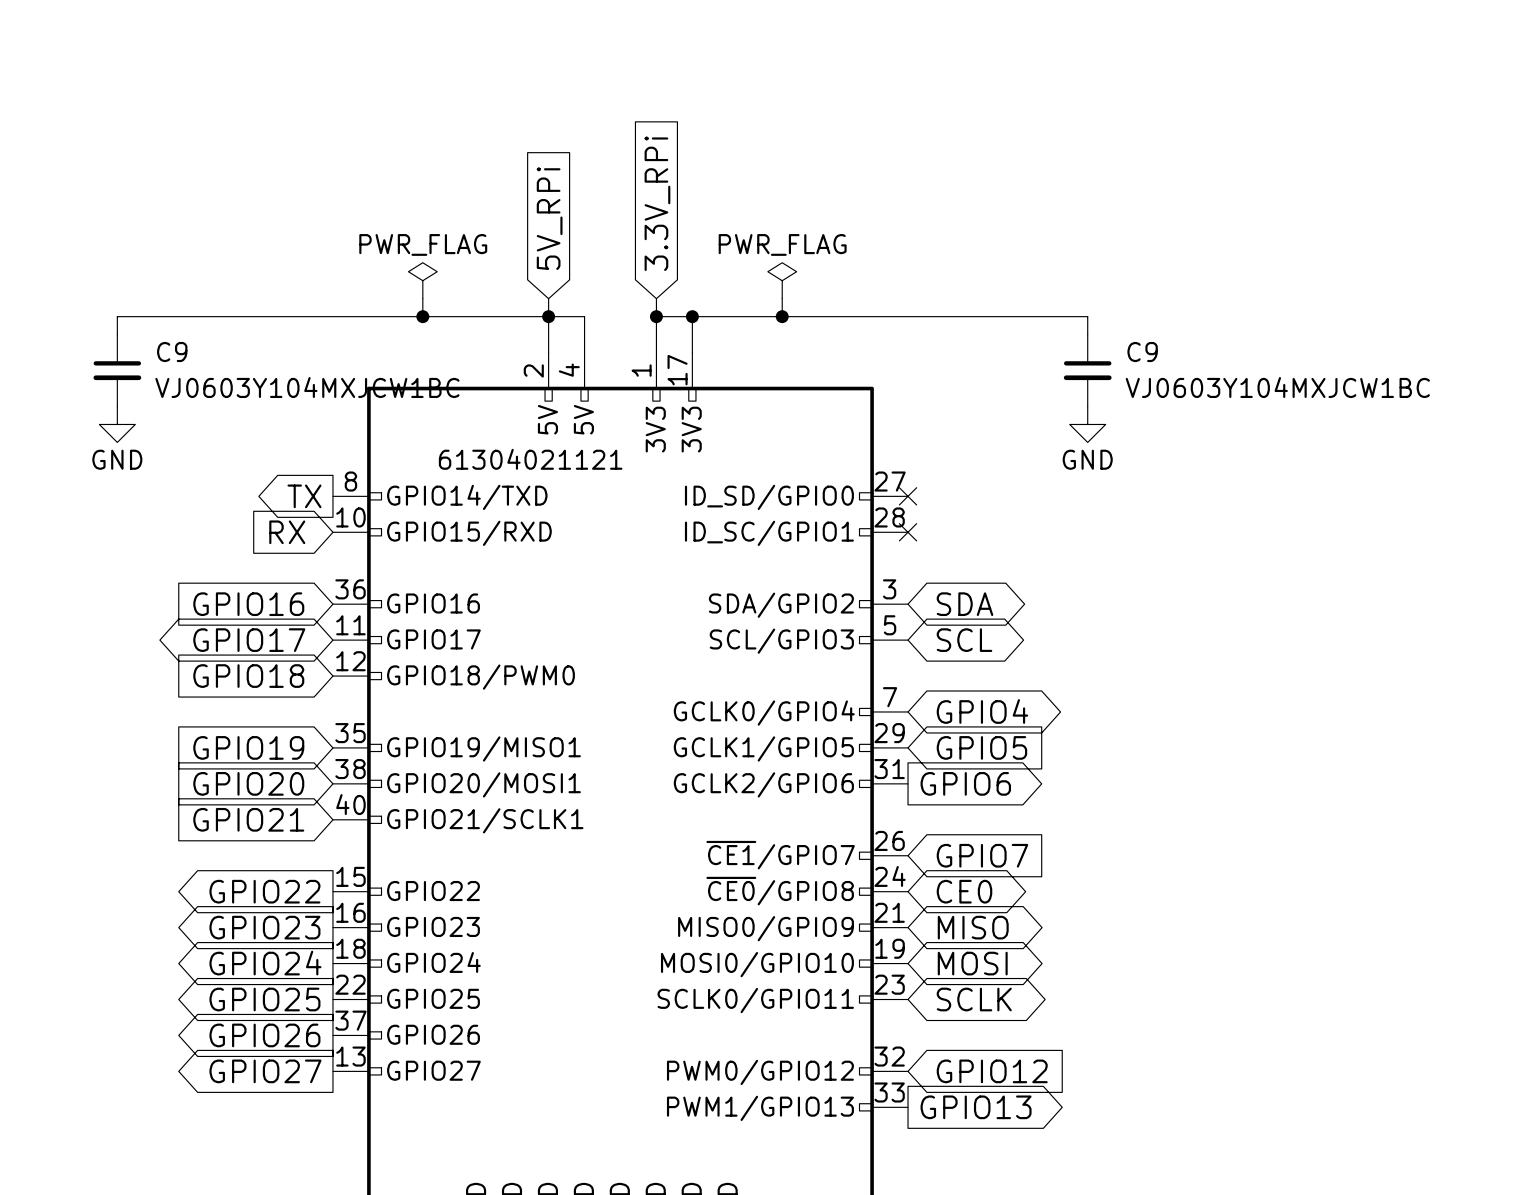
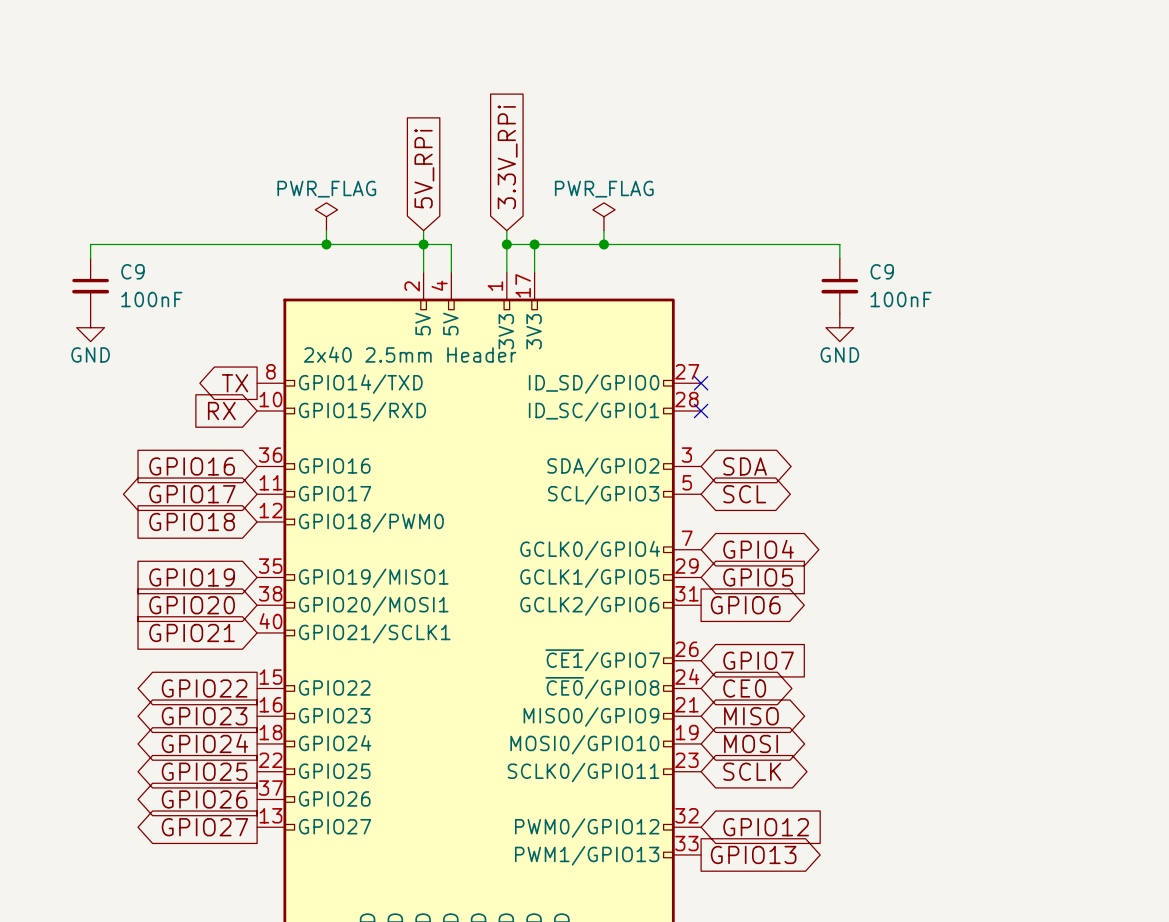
C9 value: VJ0603Y104MXJCW1BC (307, 387) -> 100nF (151, 299)
C9 value: VJ0603Y104MXJCW1BC (1277, 387) -> 100nF (901, 299)
part value: 61304021121 (530, 459) -> 2x40 2.5mm Header (410, 354)

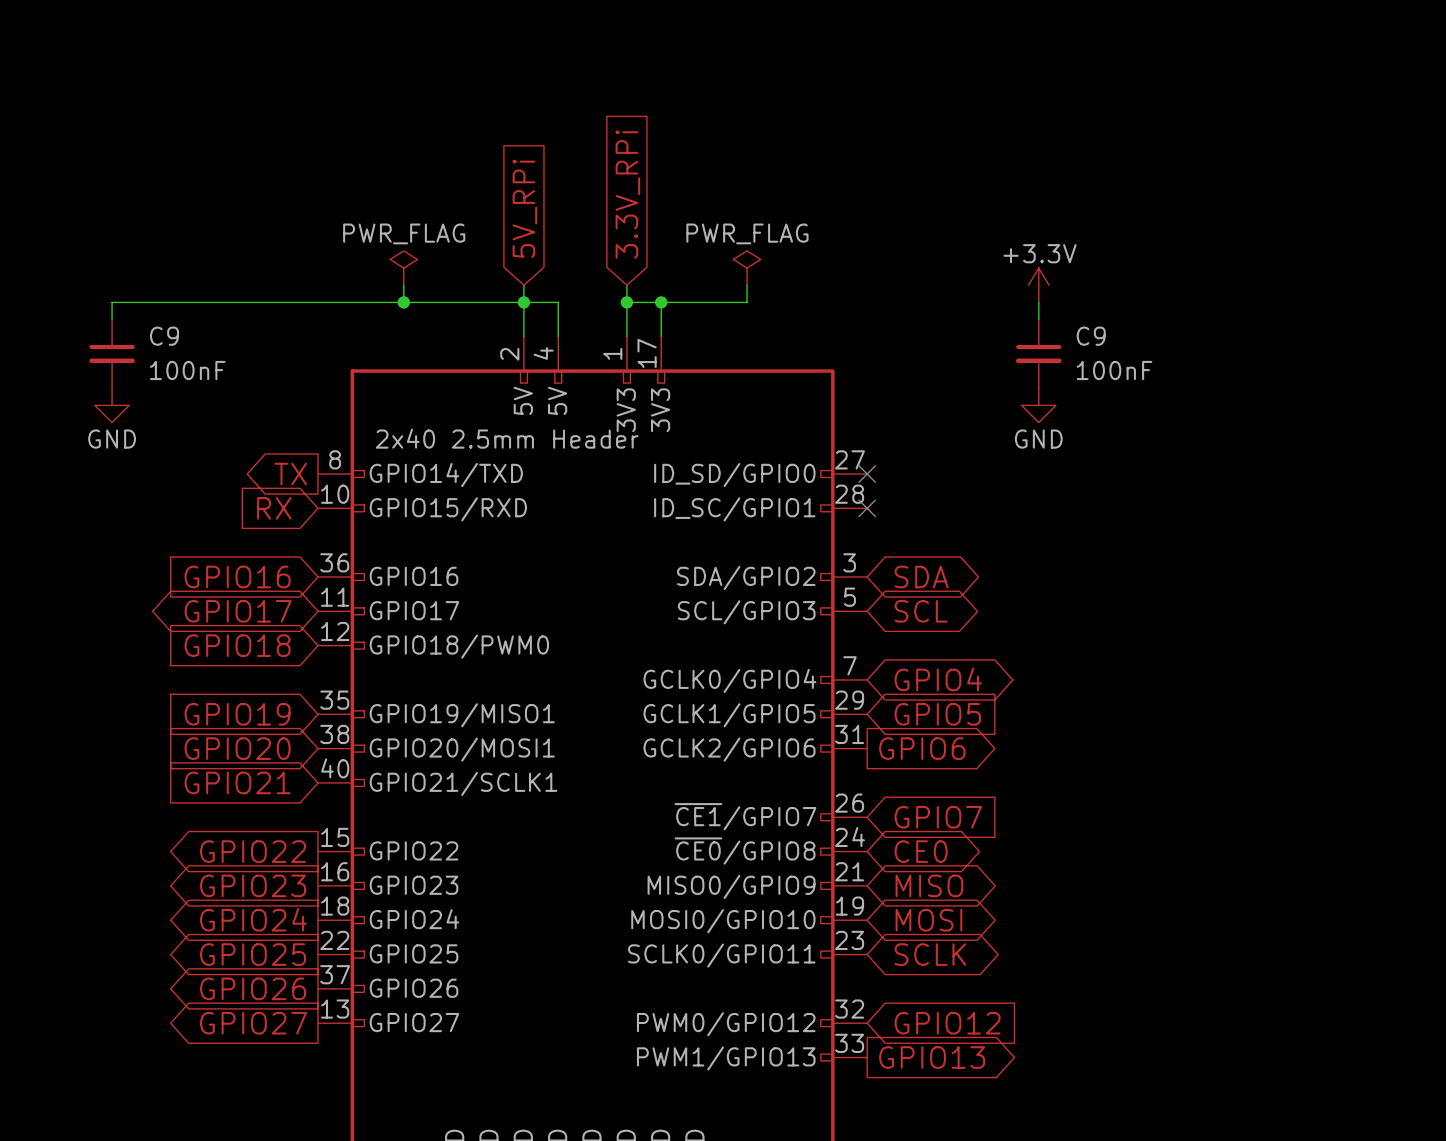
power symbol: none -> +3.3V (1038, 285)
wire: (603, 244) (839, 244) -> none
junction: (603, 244) -> none

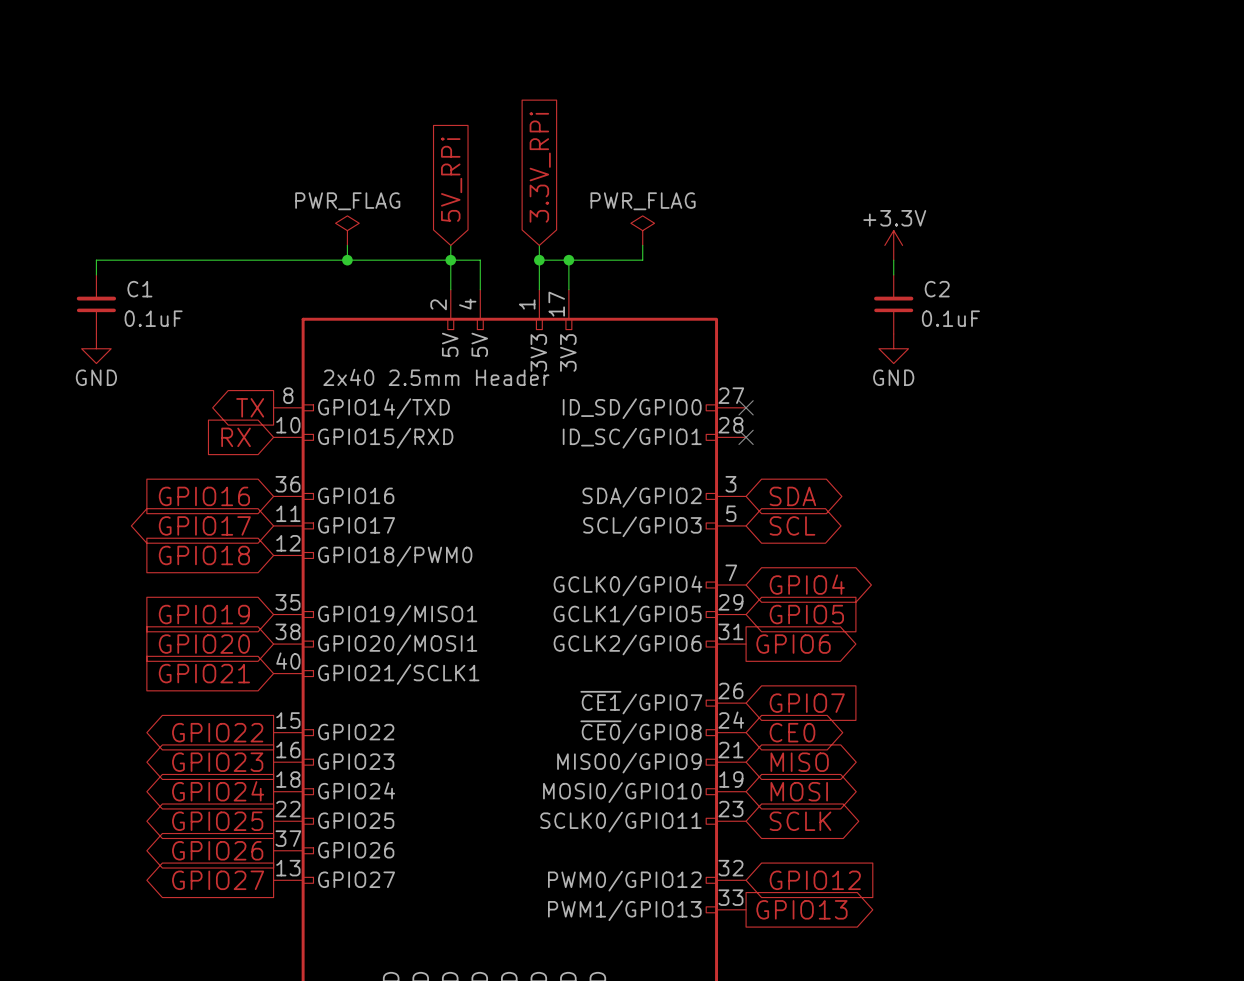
C9: 100nF (112, 353) -> none
C1: none -> 0.1uF (96, 304)
C9: 100nF (1038, 353) -> none
C2: none -> 0.1uF (893, 304)

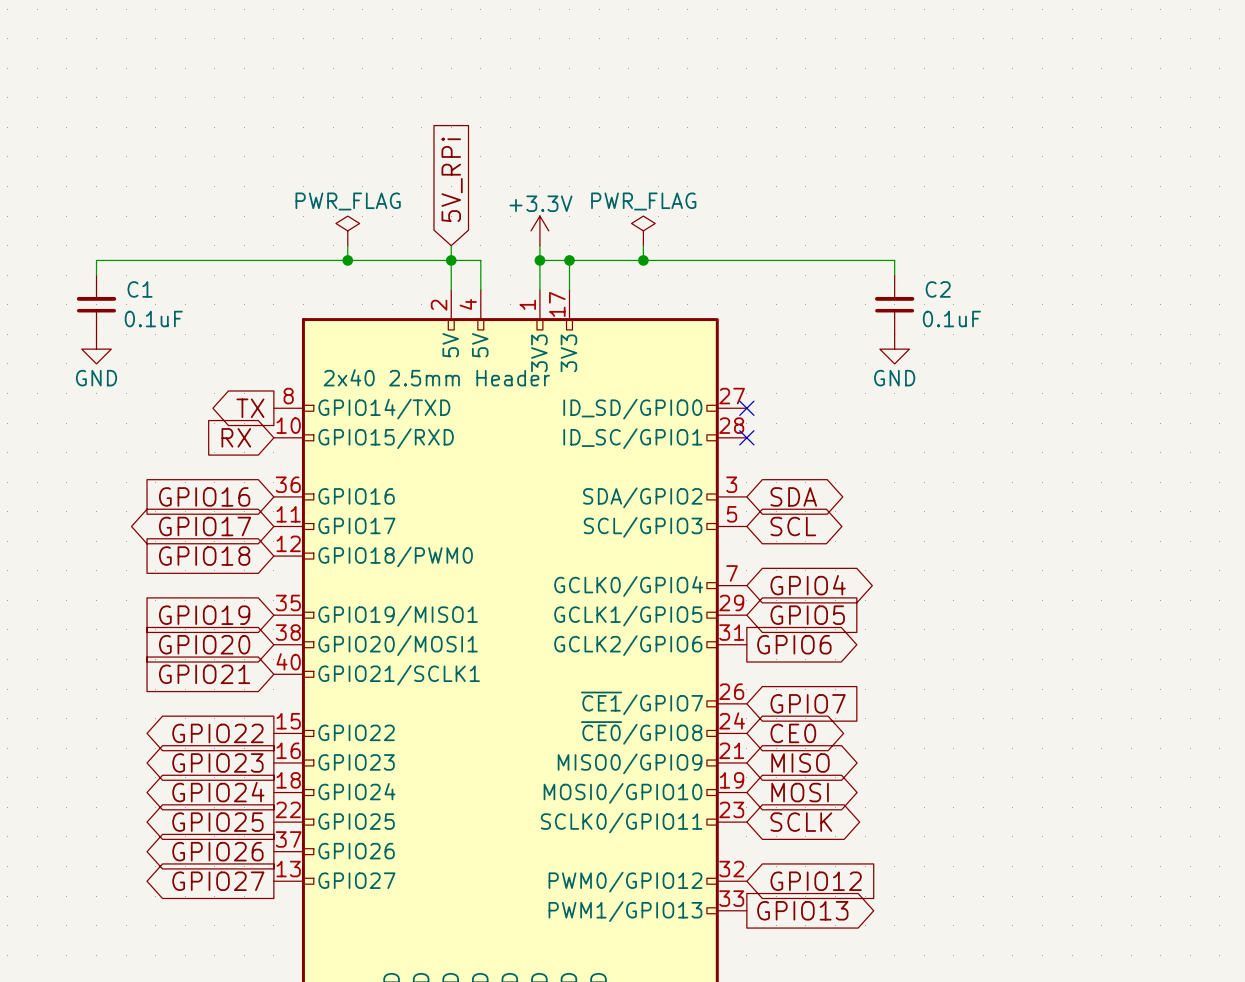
global label: 3.3V_RPi (540, 167) -> none
power symbol: none -> +3.3V (539, 230)
power symbol: +3.3V (893, 245) -> none
wire: none -> (643, 260) (894, 260)
junction: none -> (643, 260)

